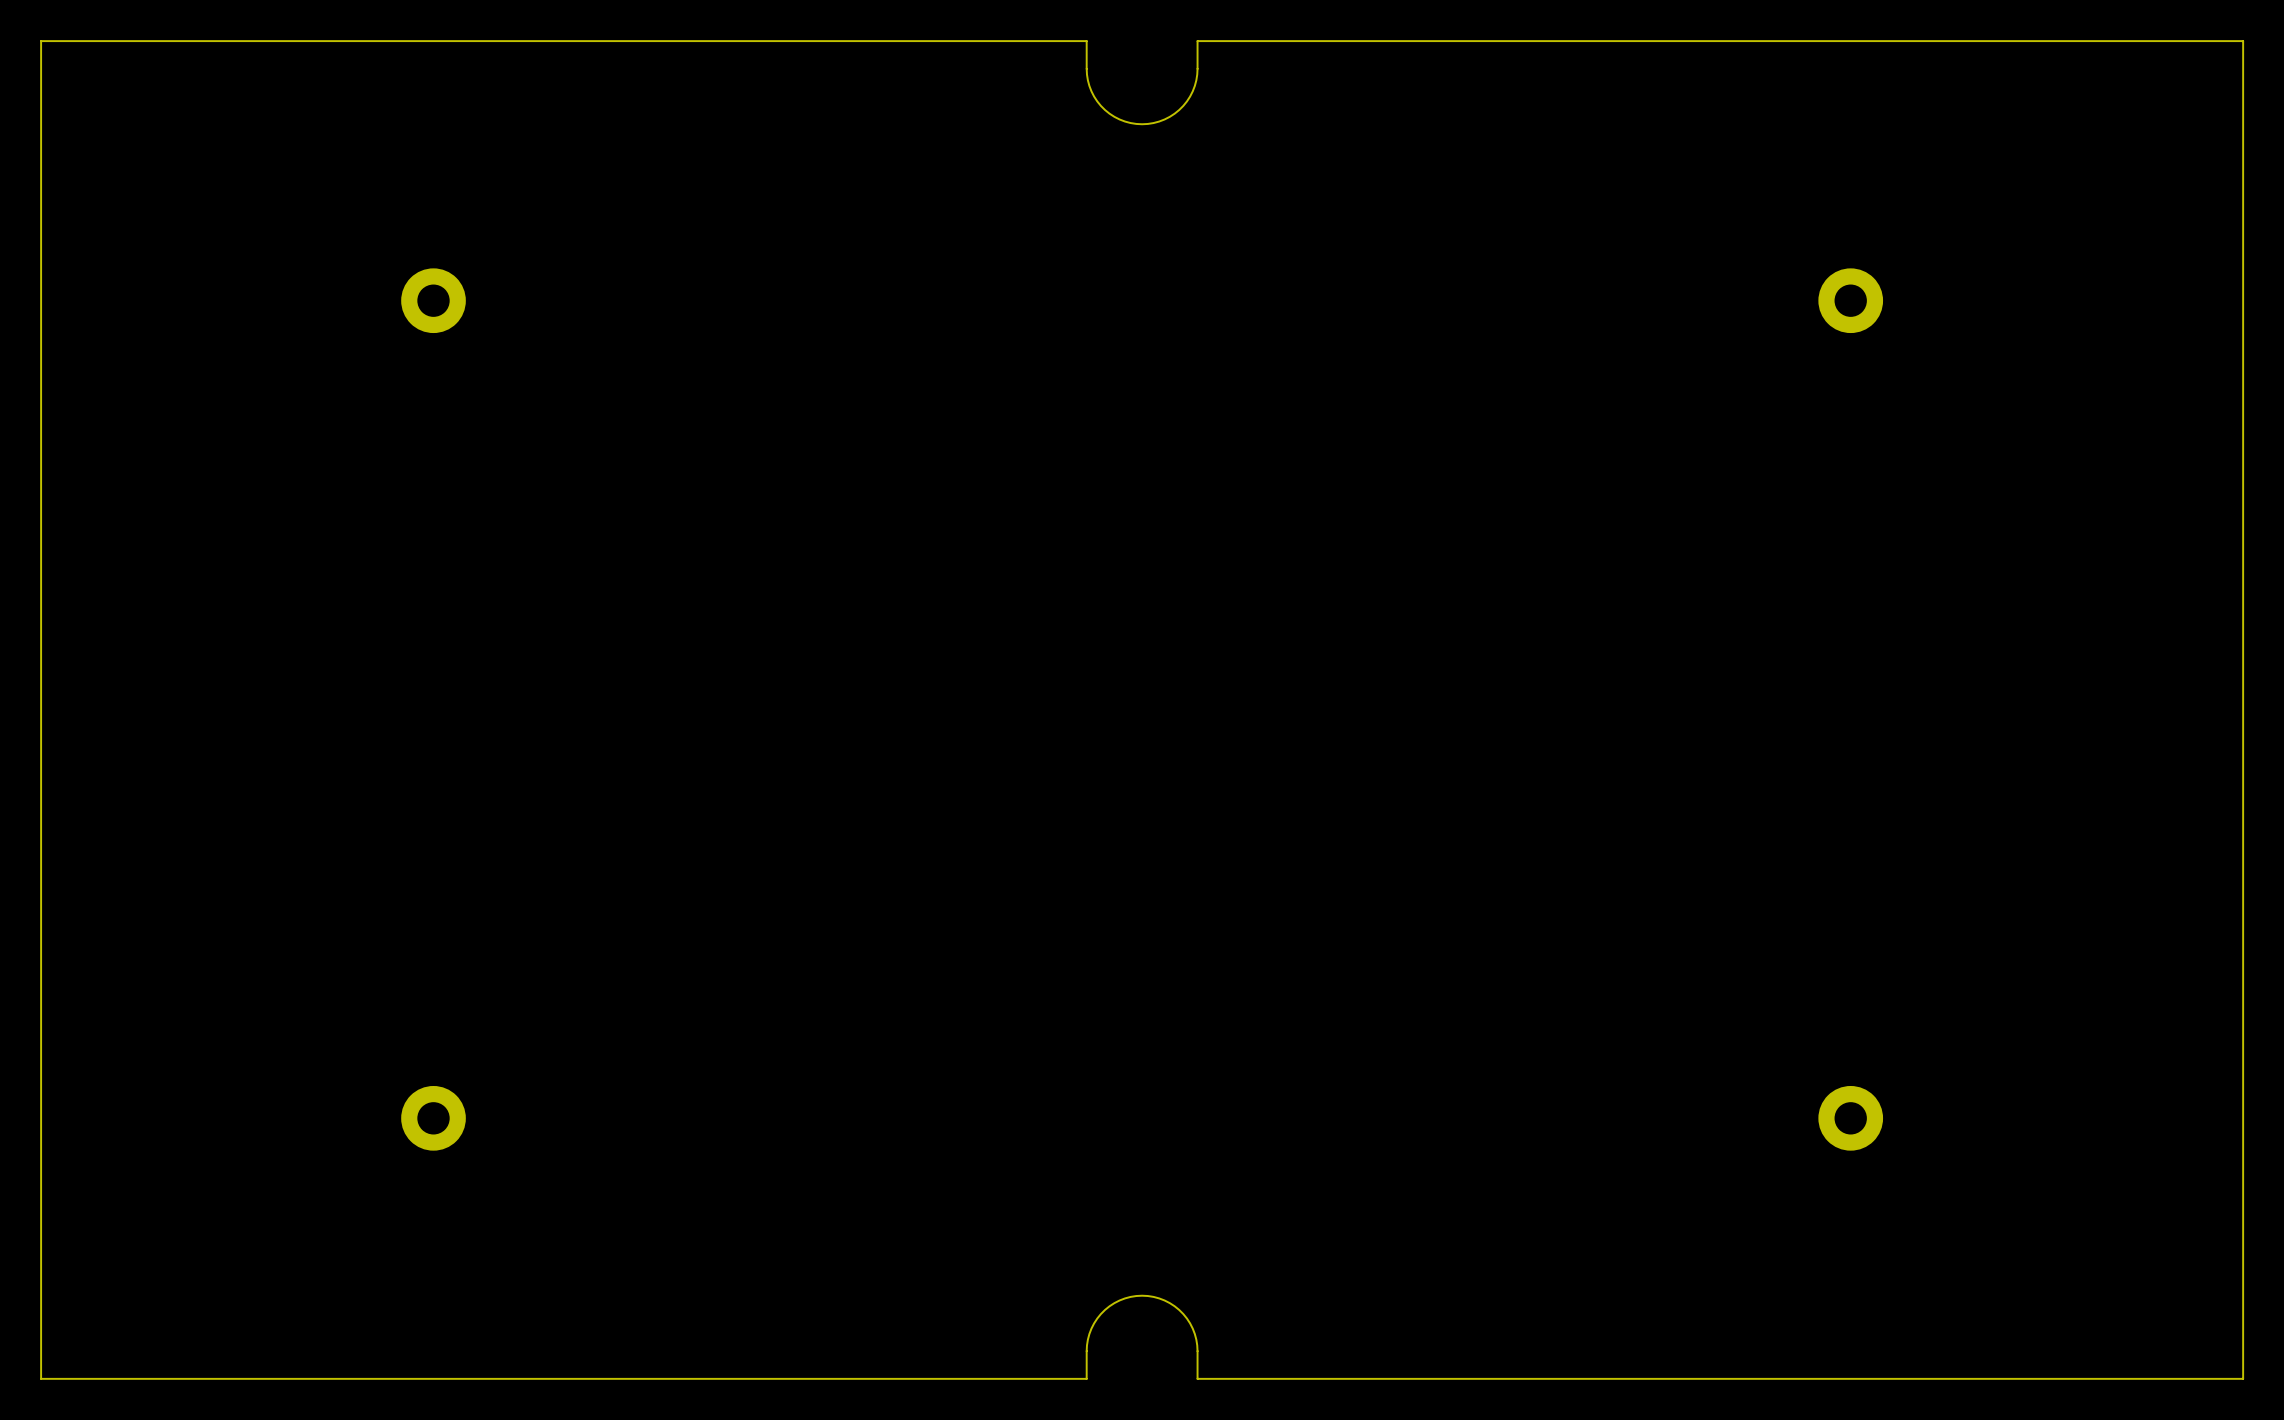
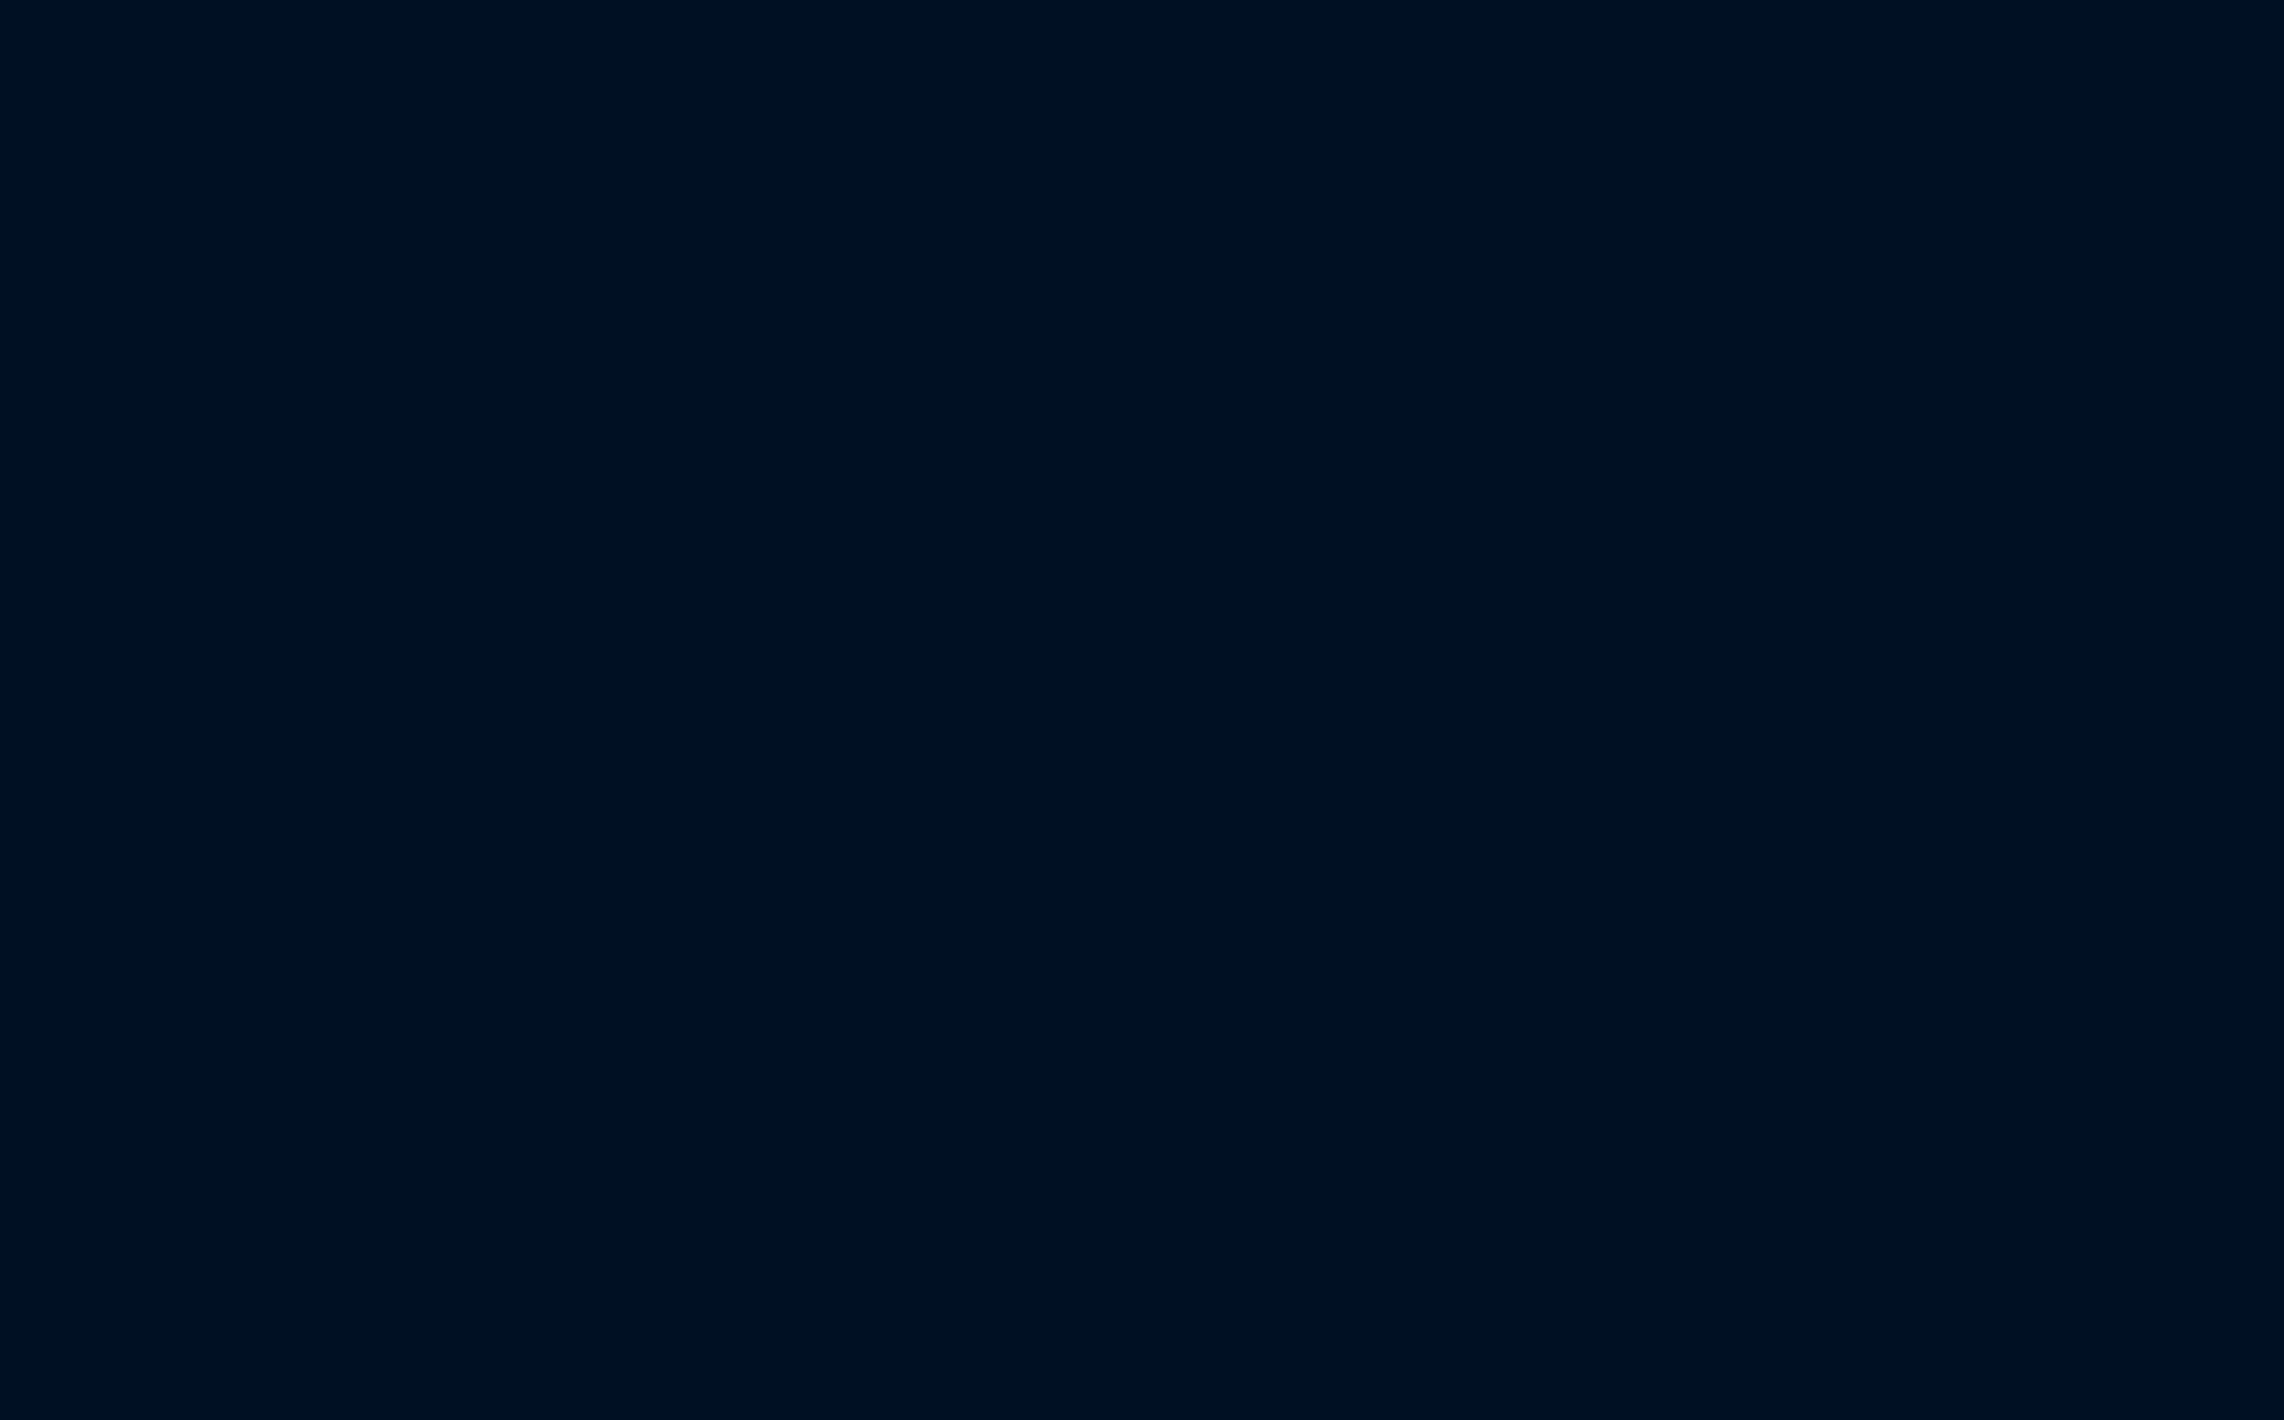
board edge: (41, 41) (1086, 41) (1087, 80) (1097, 101) (1114, 116) (1124, 121) (1142, 124) (1159, 121) (1169, 116) (1186, 101) (1196, 80) (1197, 41) (2243, 41) (2243, 1378) (1197, 1378) (1196, 1339) (1186, 1318) (1179, 1309) (1164, 1300) (1142, 1295) (1119, 1300) (1105, 1309) (1097, 1318) (1087, 1339) (1086, 1378) (41, 1378) (41, 41) -> none
part: (433, 300) -> none
part: (1850, 300) -> none
part: (433, 1118) -> none
part: (1850, 1118) -> none

